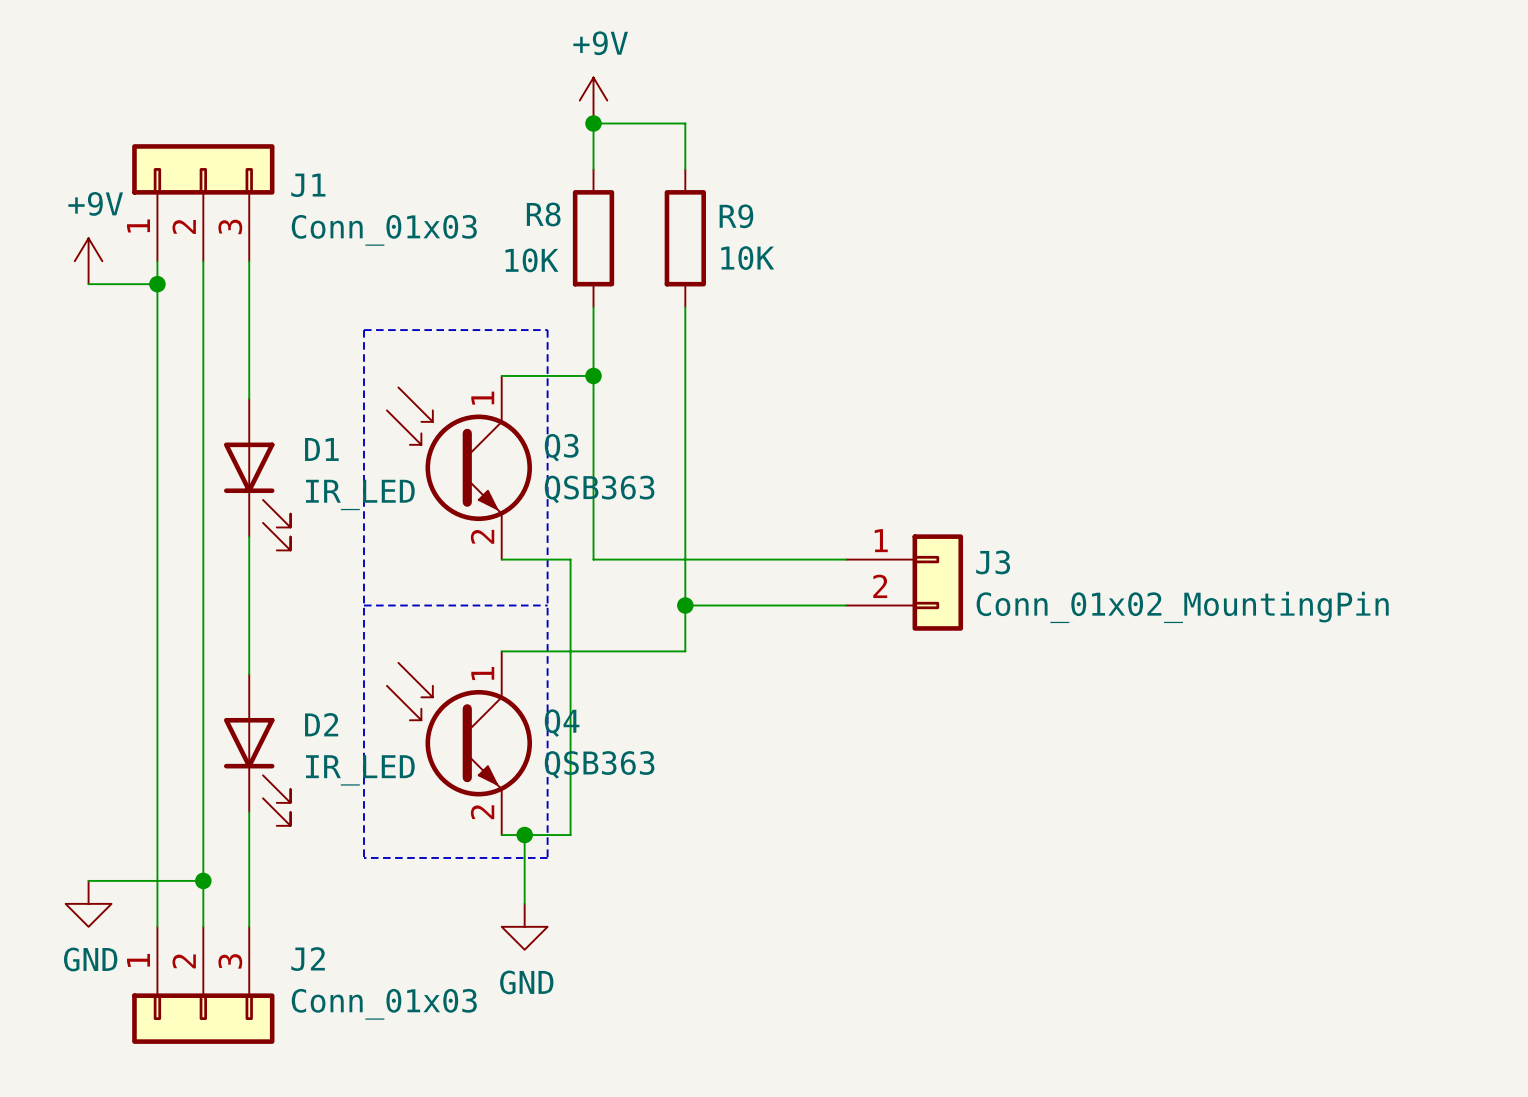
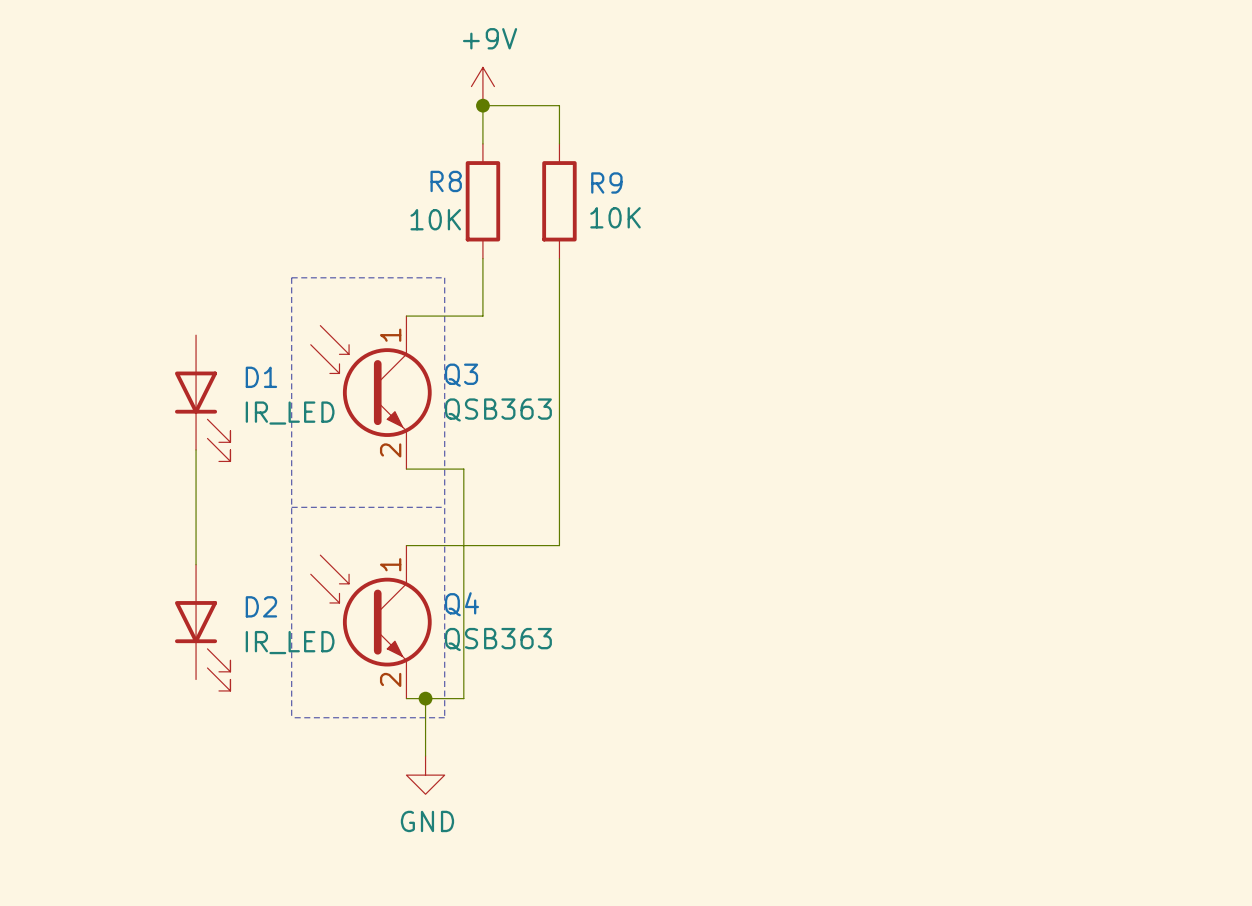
J1: Conn_01x03 (203, 202) -> none
power symbol: +9V (88, 261) -> none
wire: (157, 261) (157, 926) -> none
wire: (203, 261) (203, 926) -> none
wire: (249, 261) (249, 398) -> none
wire: (88, 284) (157, 284) -> none
junction: (157, 284) -> none
wire: (593, 375) (593, 559) (845, 559) -> none
junction: (593, 375) -> none
J3: Conn_01x02_MountingPin (904, 582) -> none
wire: (685, 605) (845, 605) -> none
junction: (685, 605) -> none
wire: (249, 812) (249, 926) -> none
wire: (88, 880) (203, 880) -> none
junction: (203, 880) -> none
power symbol: GND (88, 903) -> none
J2: Conn_01x03 (203, 985) -> none

